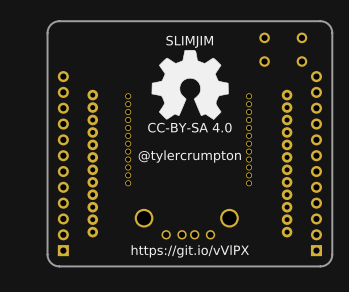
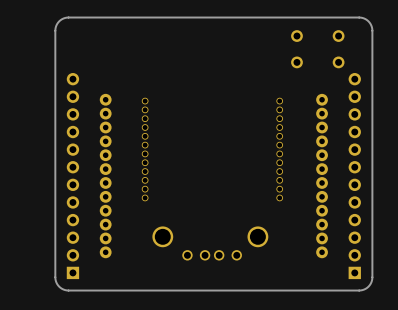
text: SLIMJIM (189, 41) -> none
drawing: [151, 49, 229, 120] -> none
text: CC-BY-SA 4.0 (189, 127) -> none
text: @tylercrumpton (189, 156) -> none
text: https://git.io/vVlPX (190, 251) -> none

